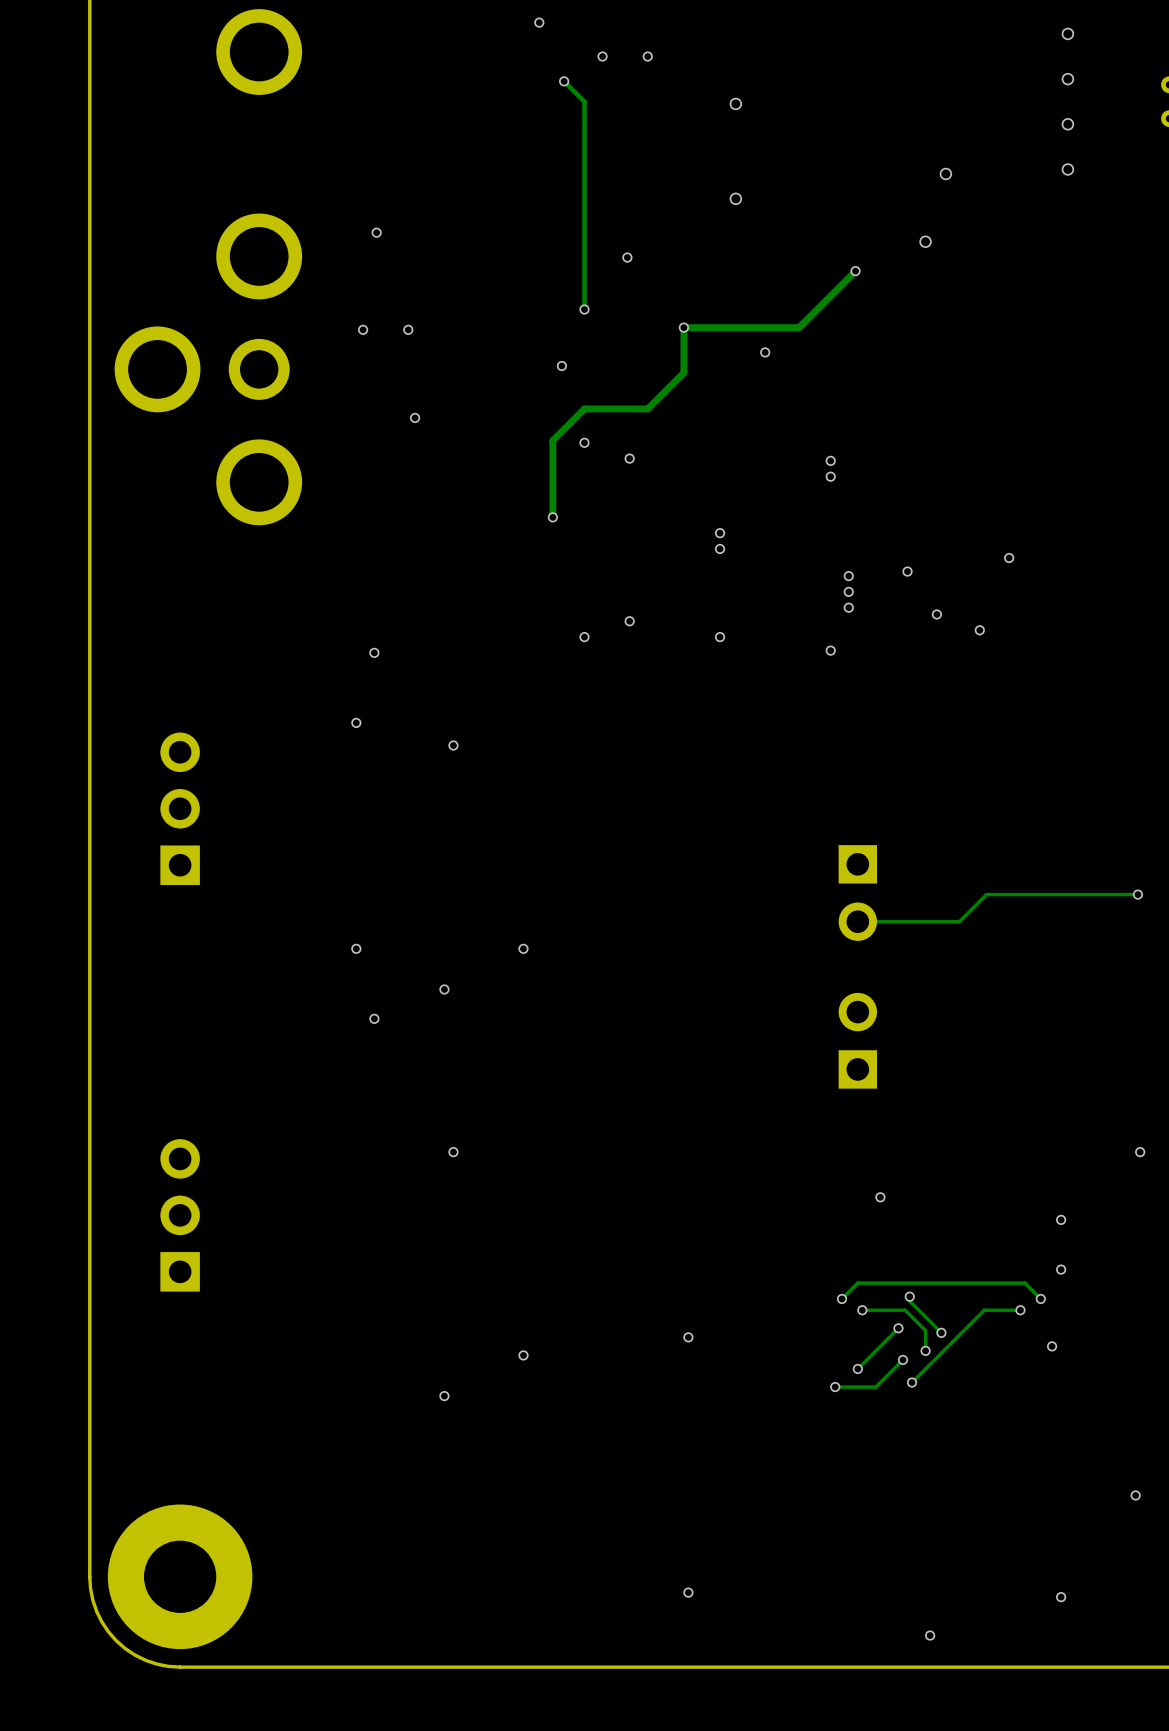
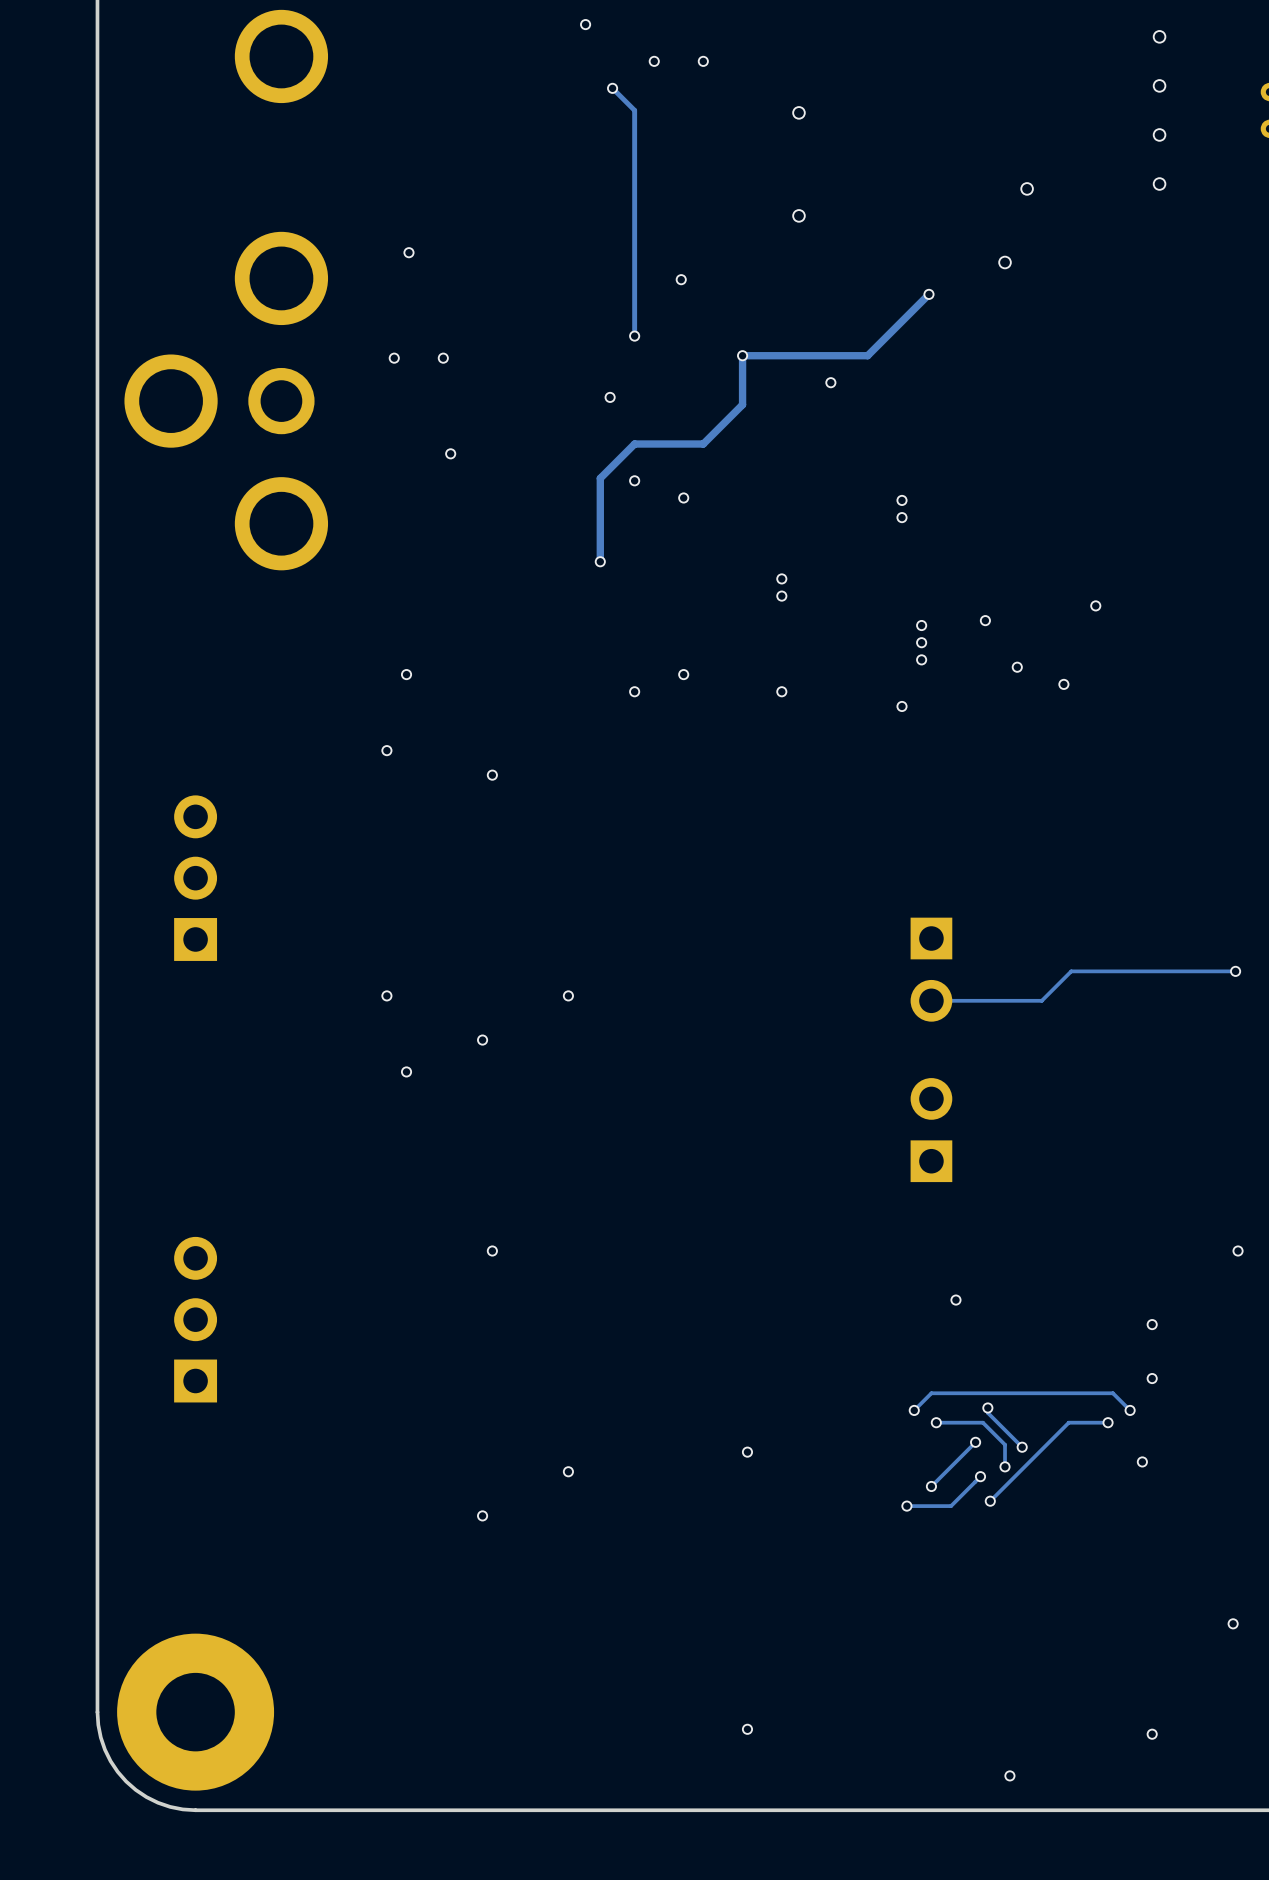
via: none -> (406, 674)
via: (374, 652) -> none
via: none -> (386, 750)
via: (356, 722) -> none
via position: (453, 745) -> (492, 775)
via: none -> (386, 995)
via: (356, 948) -> none
via position: (523, 948) -> (568, 995)
via: none -> (406, 1071)
via position: (444, 989) -> (482, 1040)
via: (374, 1018) -> none

